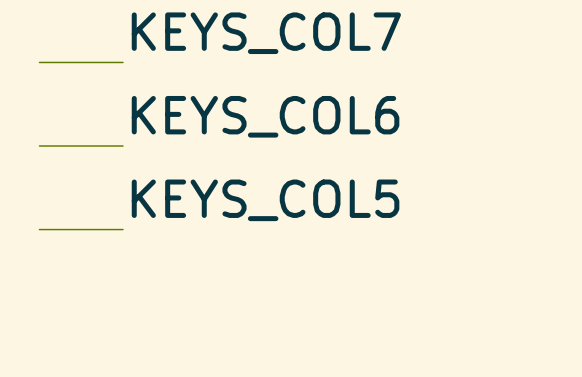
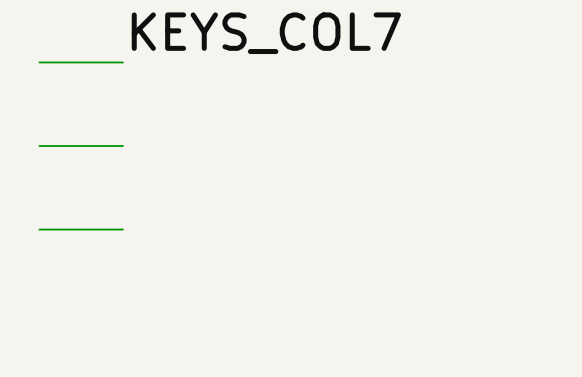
label: KEYS_COL6 (265, 116) -> none
label: KEYS_COL5 (265, 200) -> none

